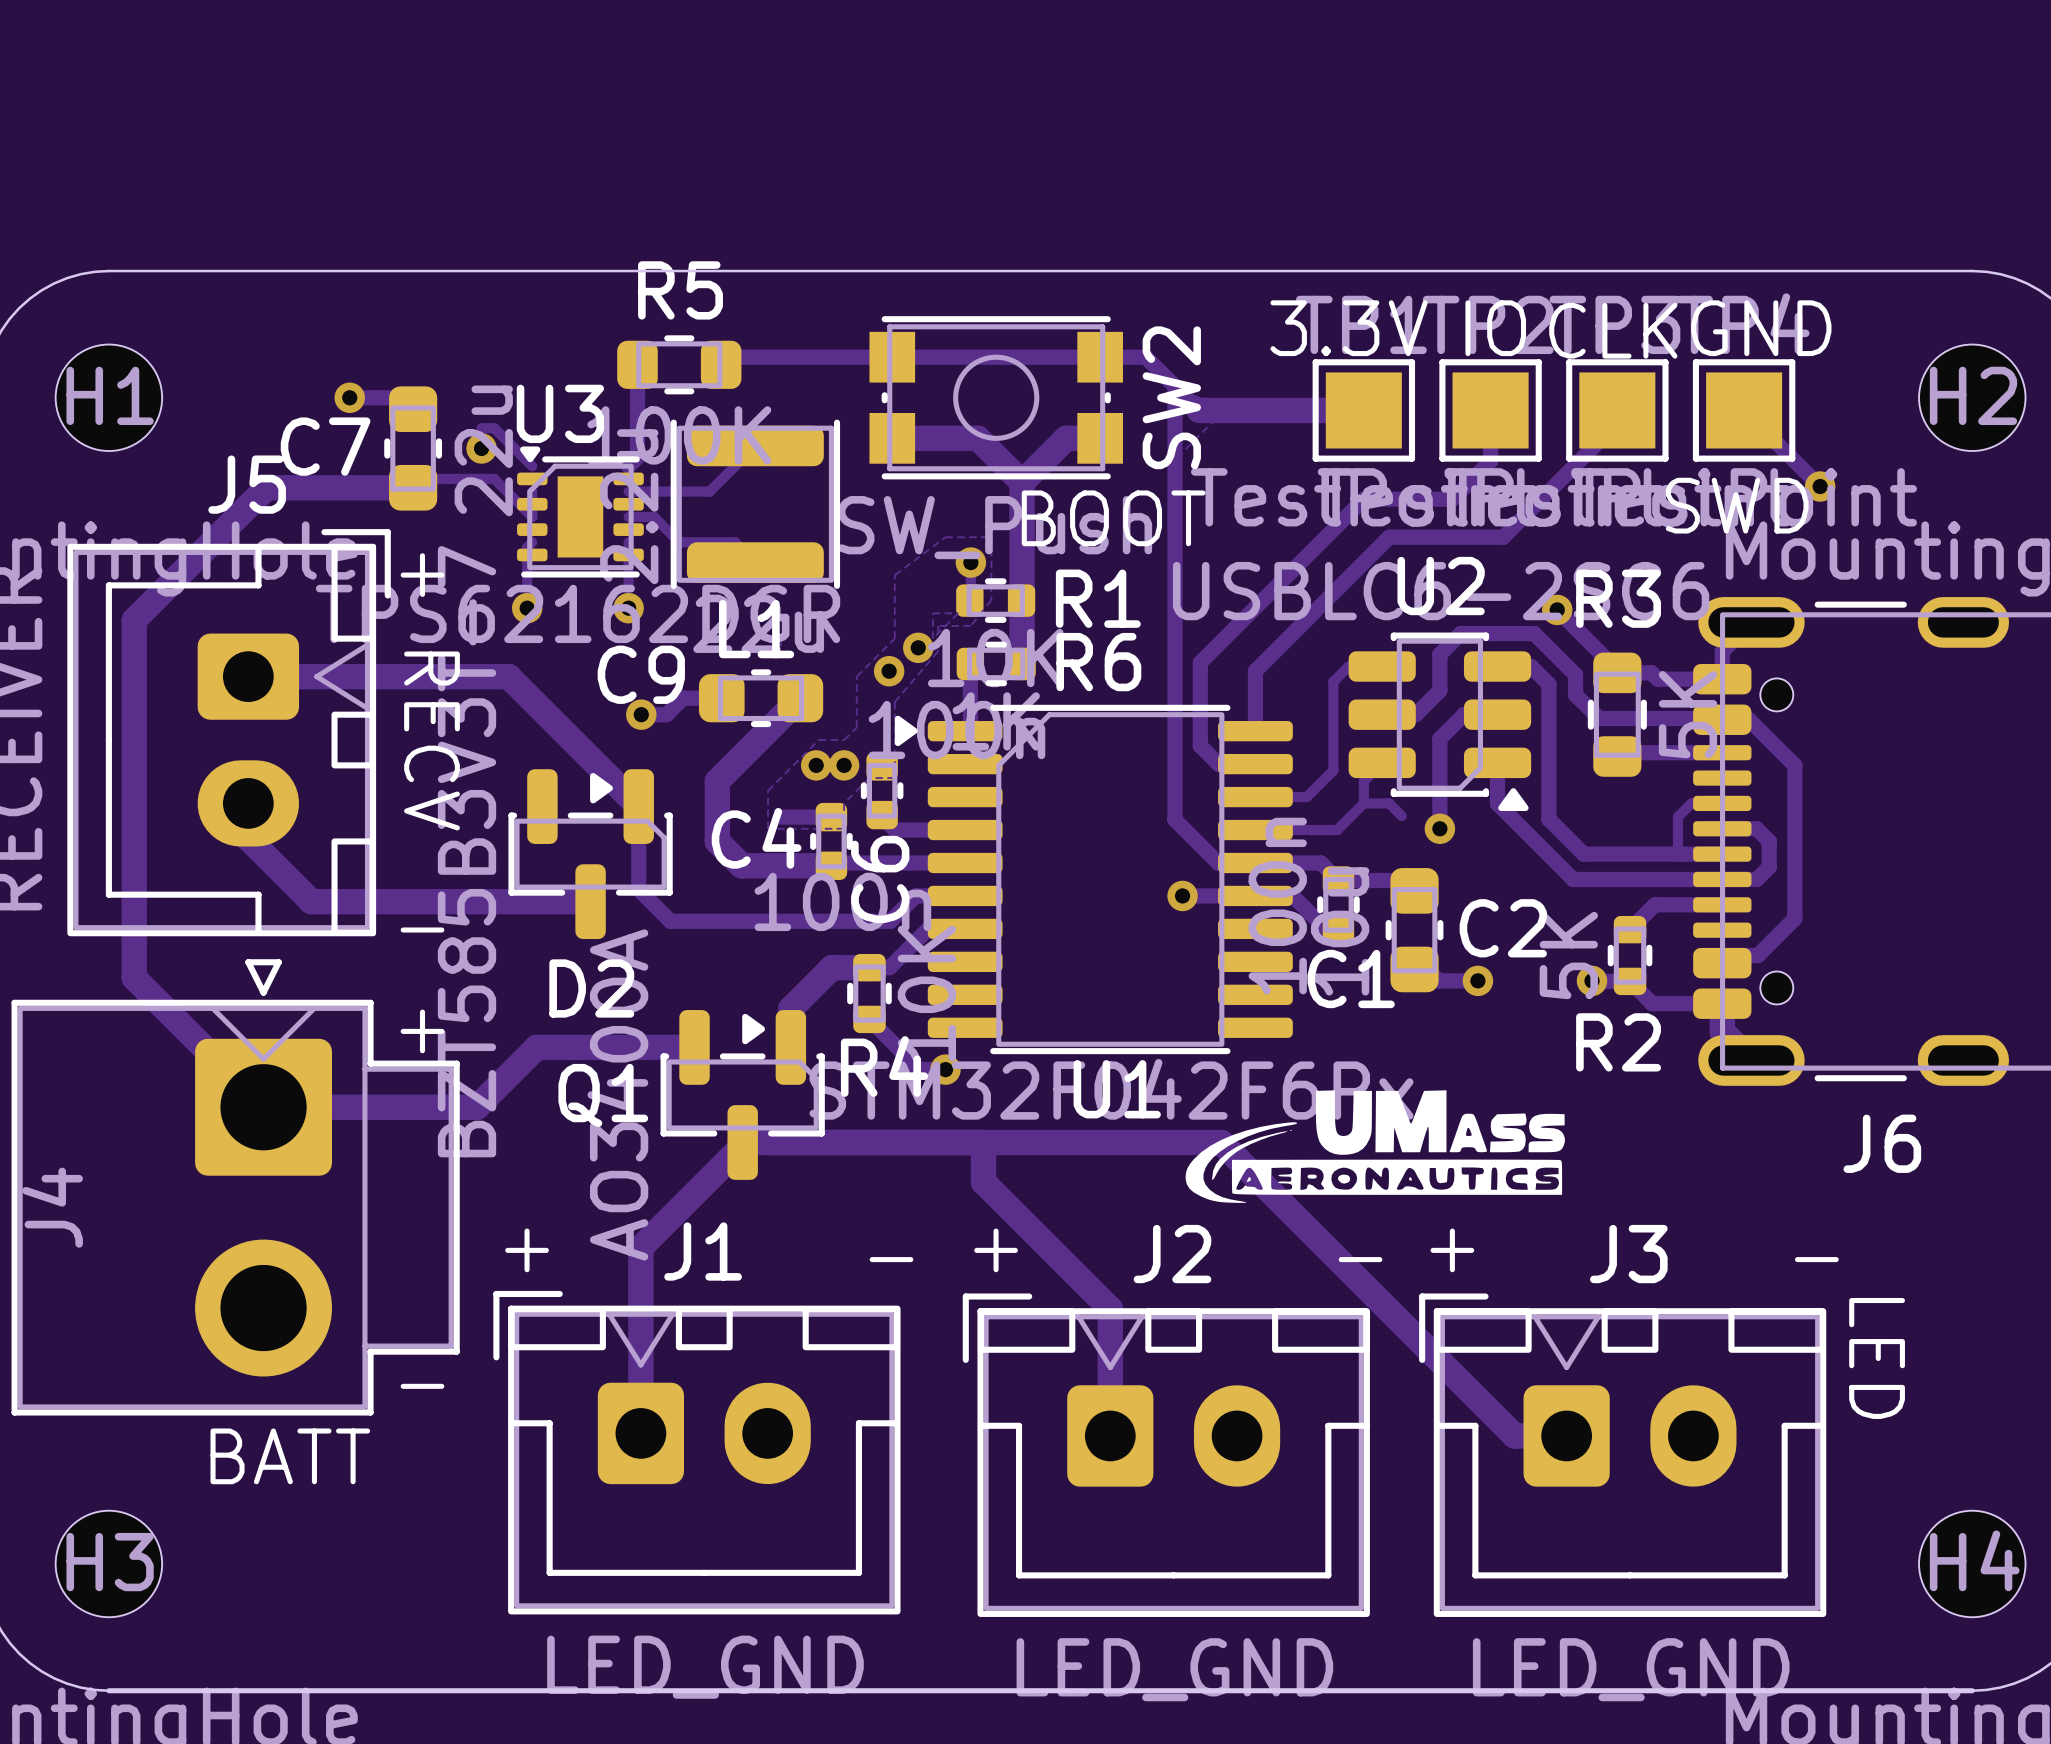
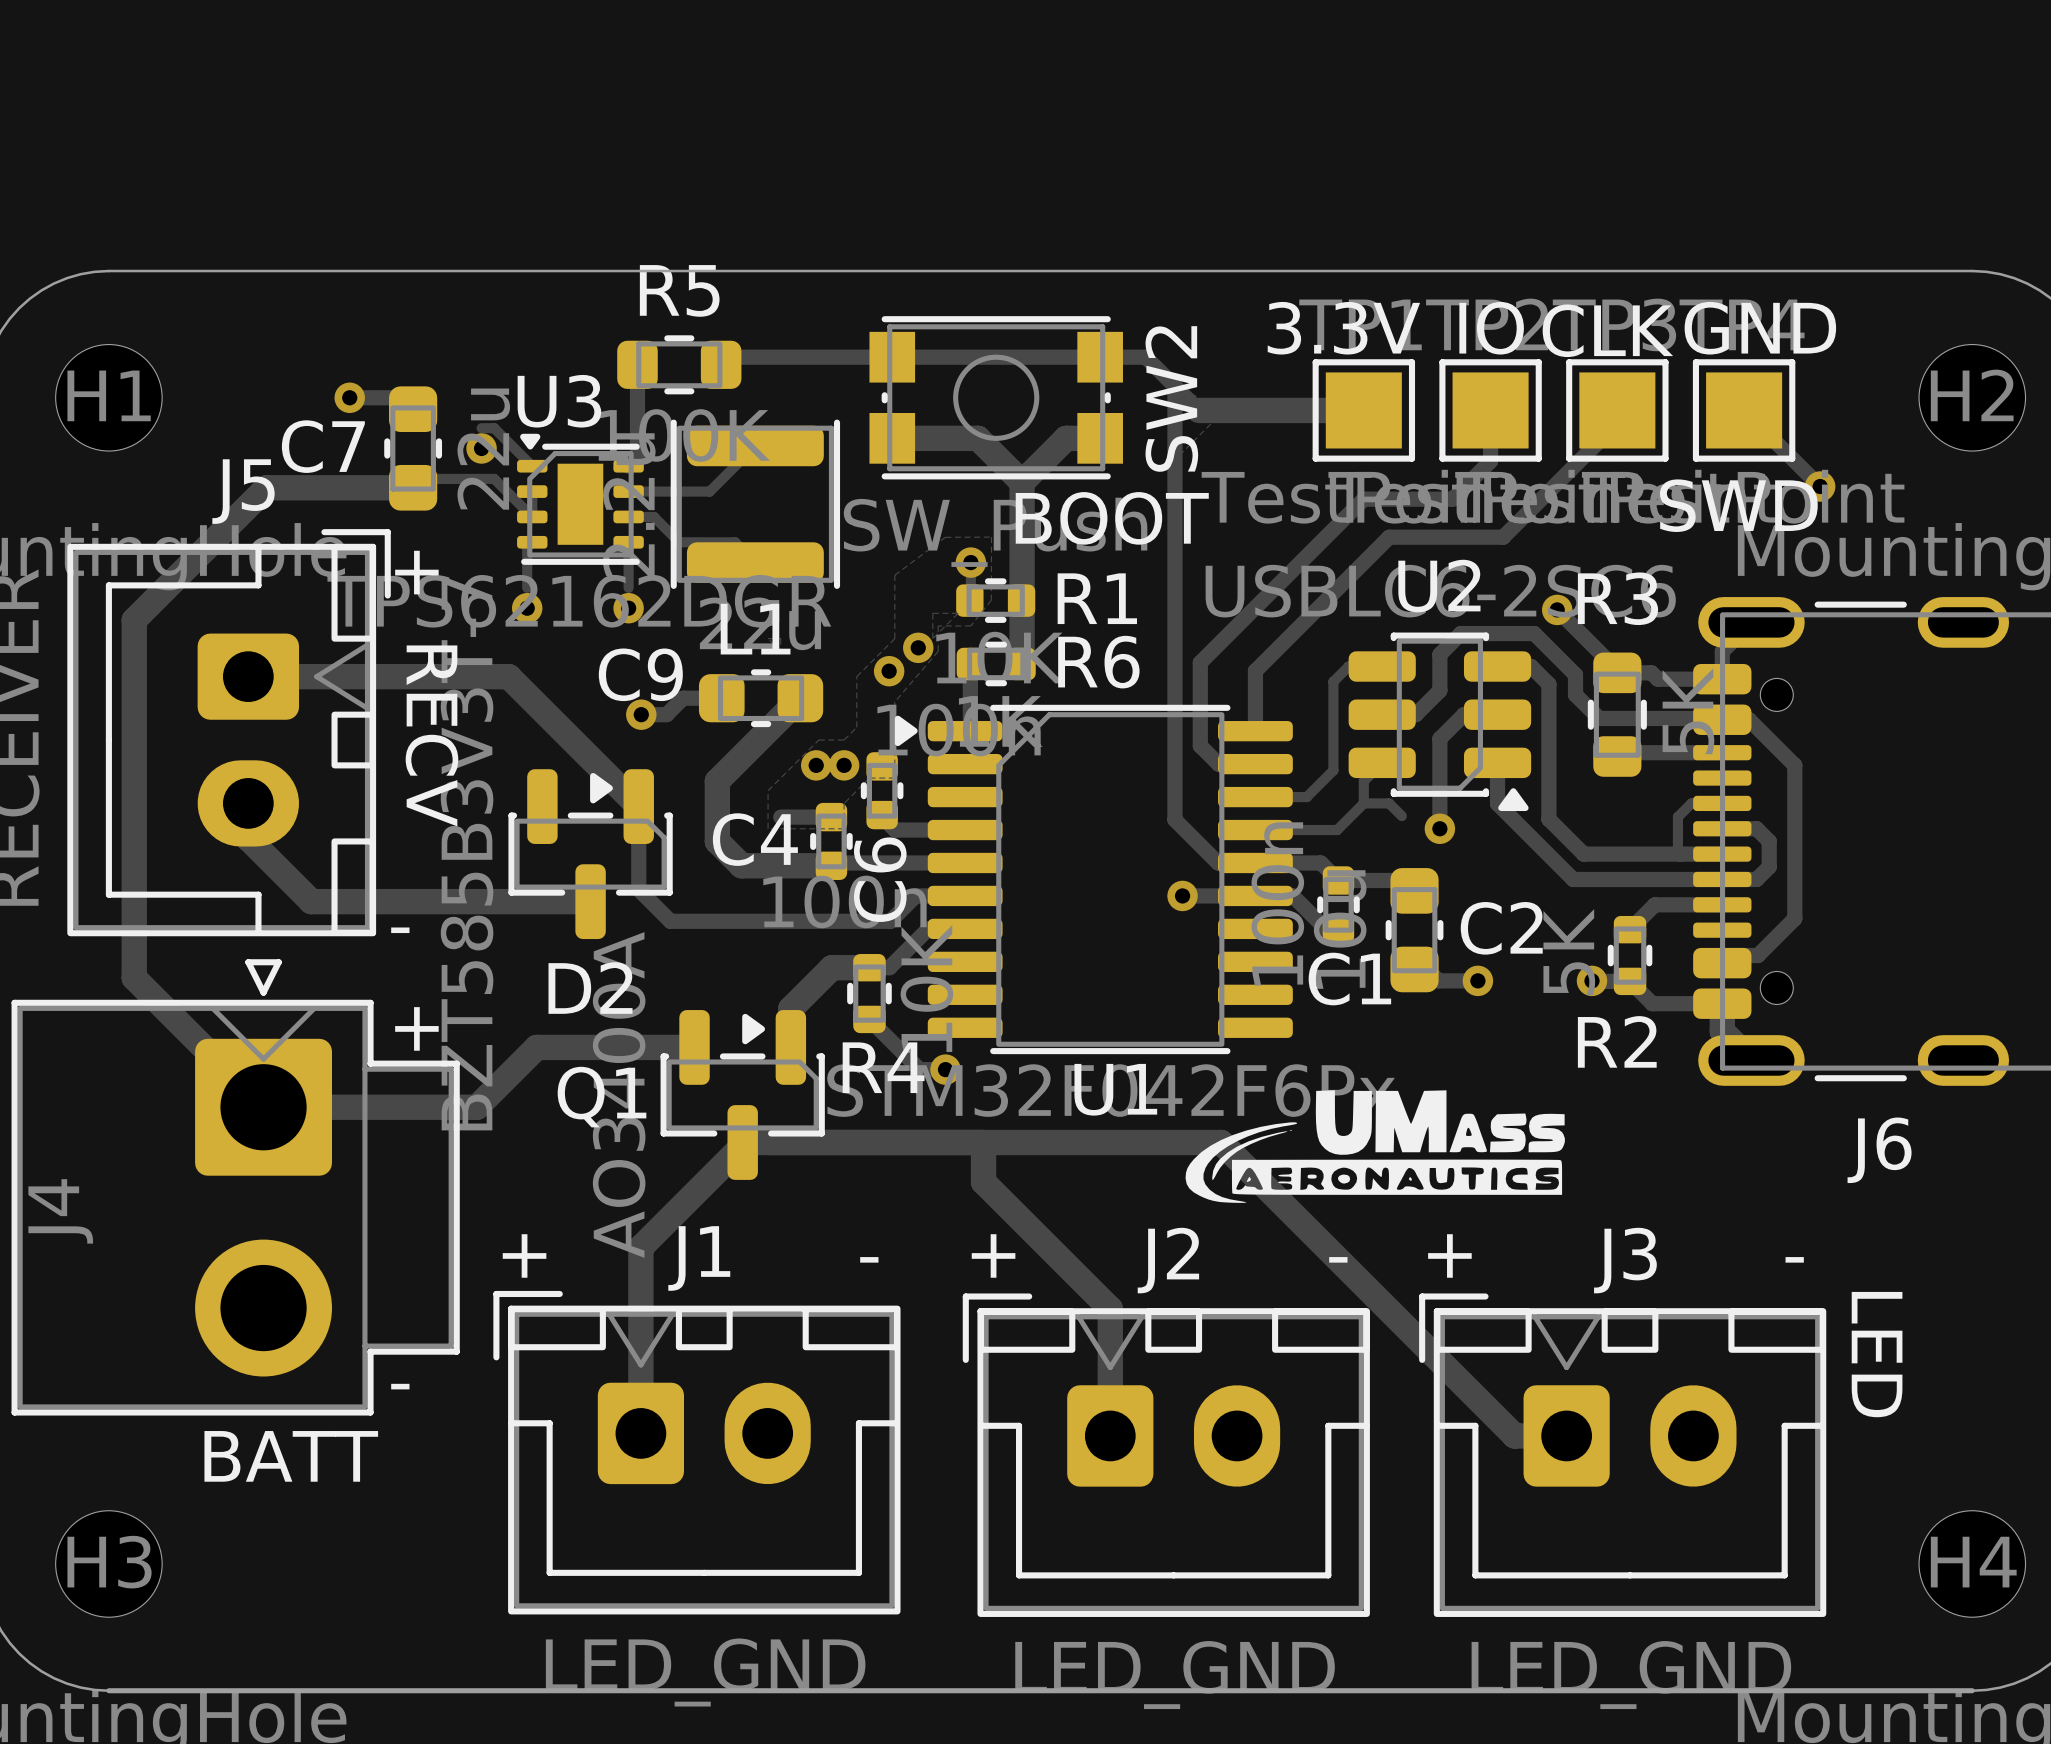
U3 position: (580, 511) -> (580, 499)

